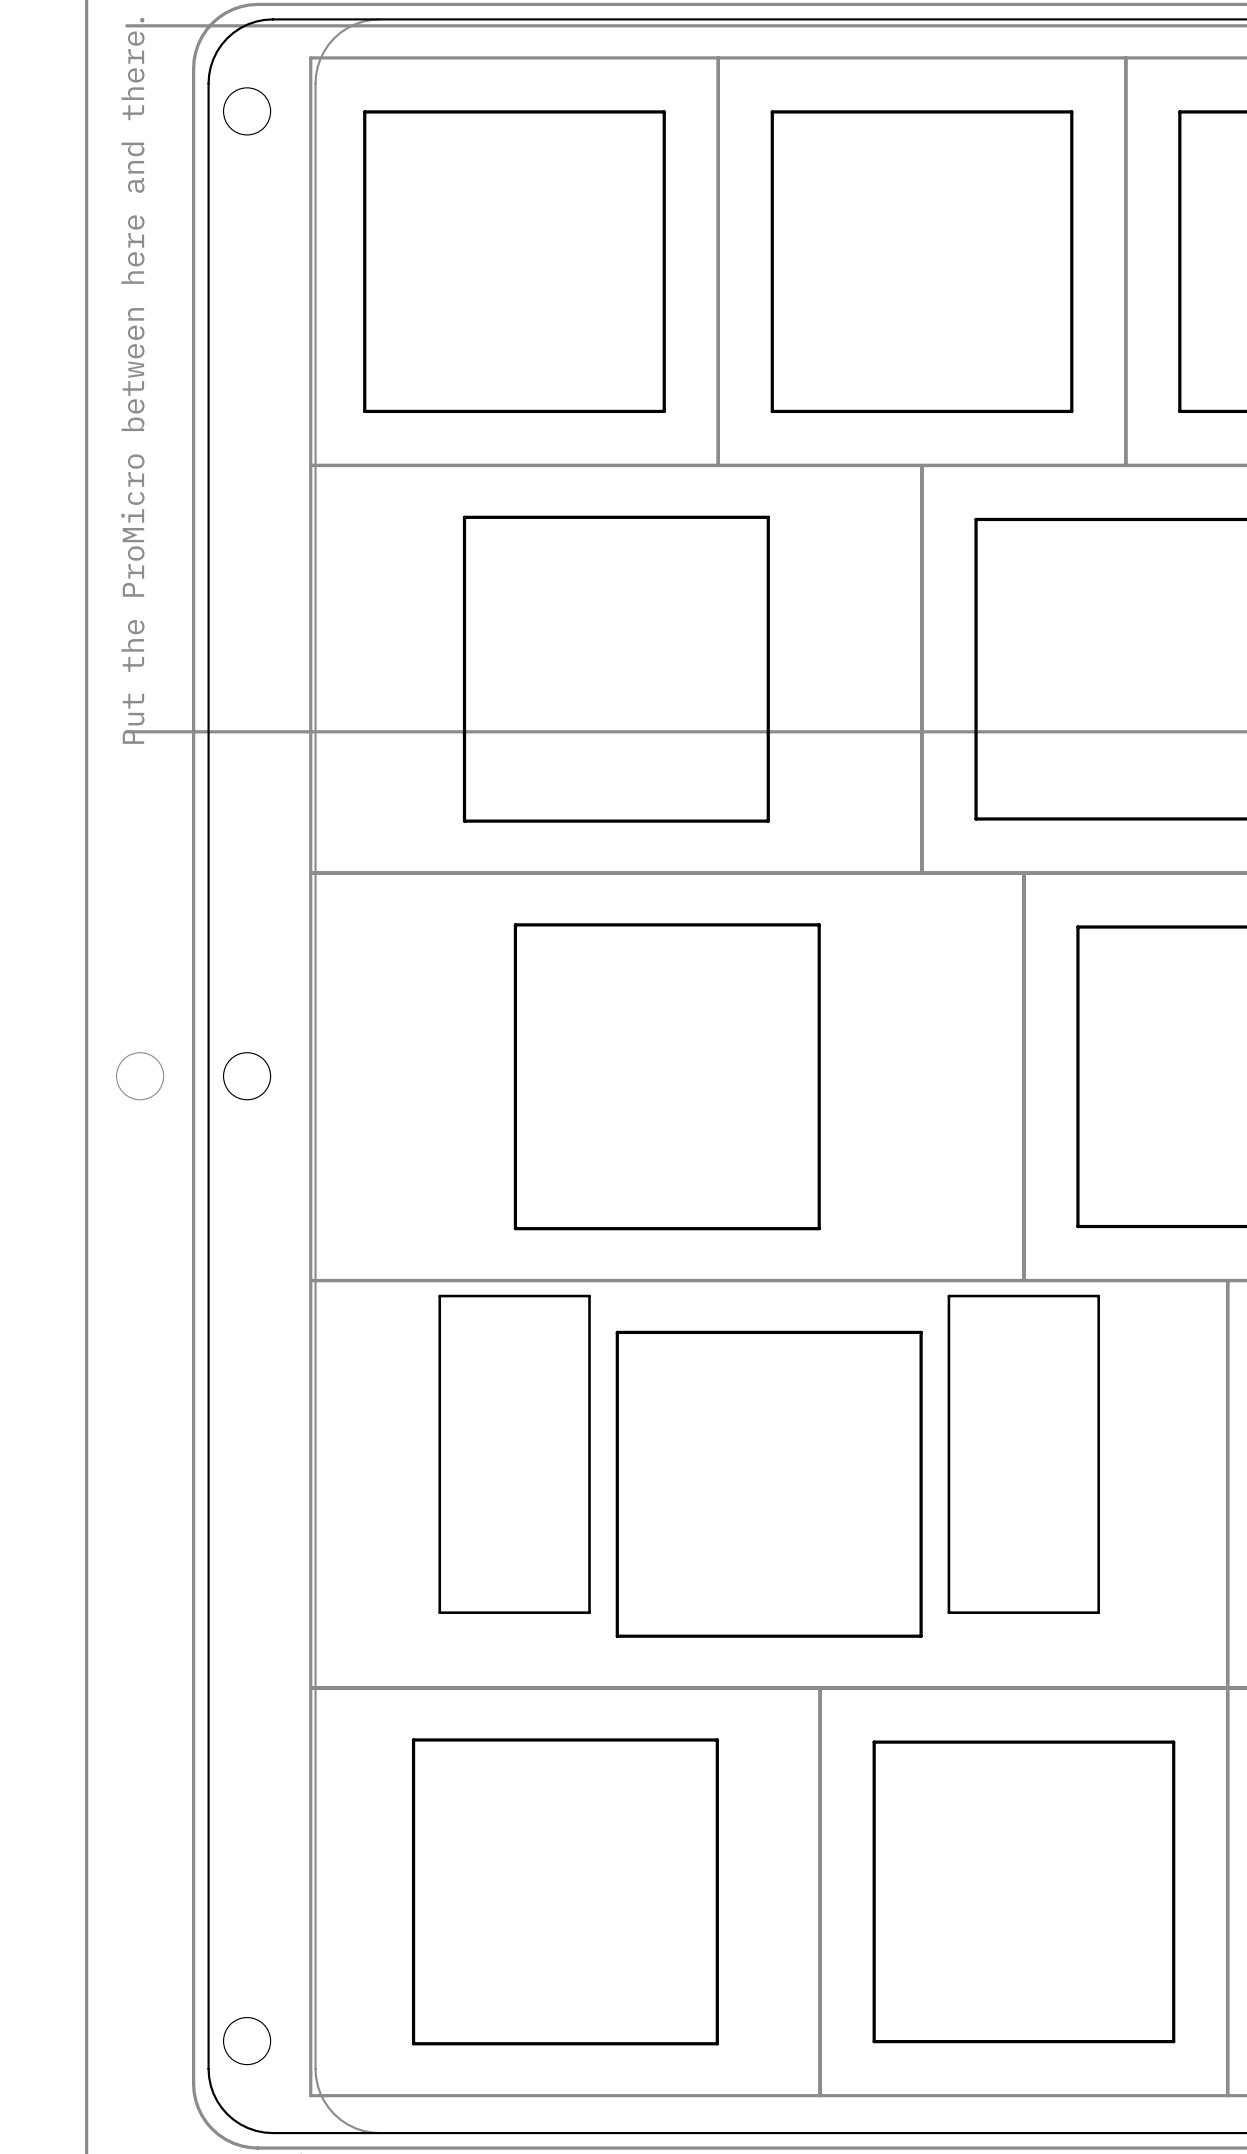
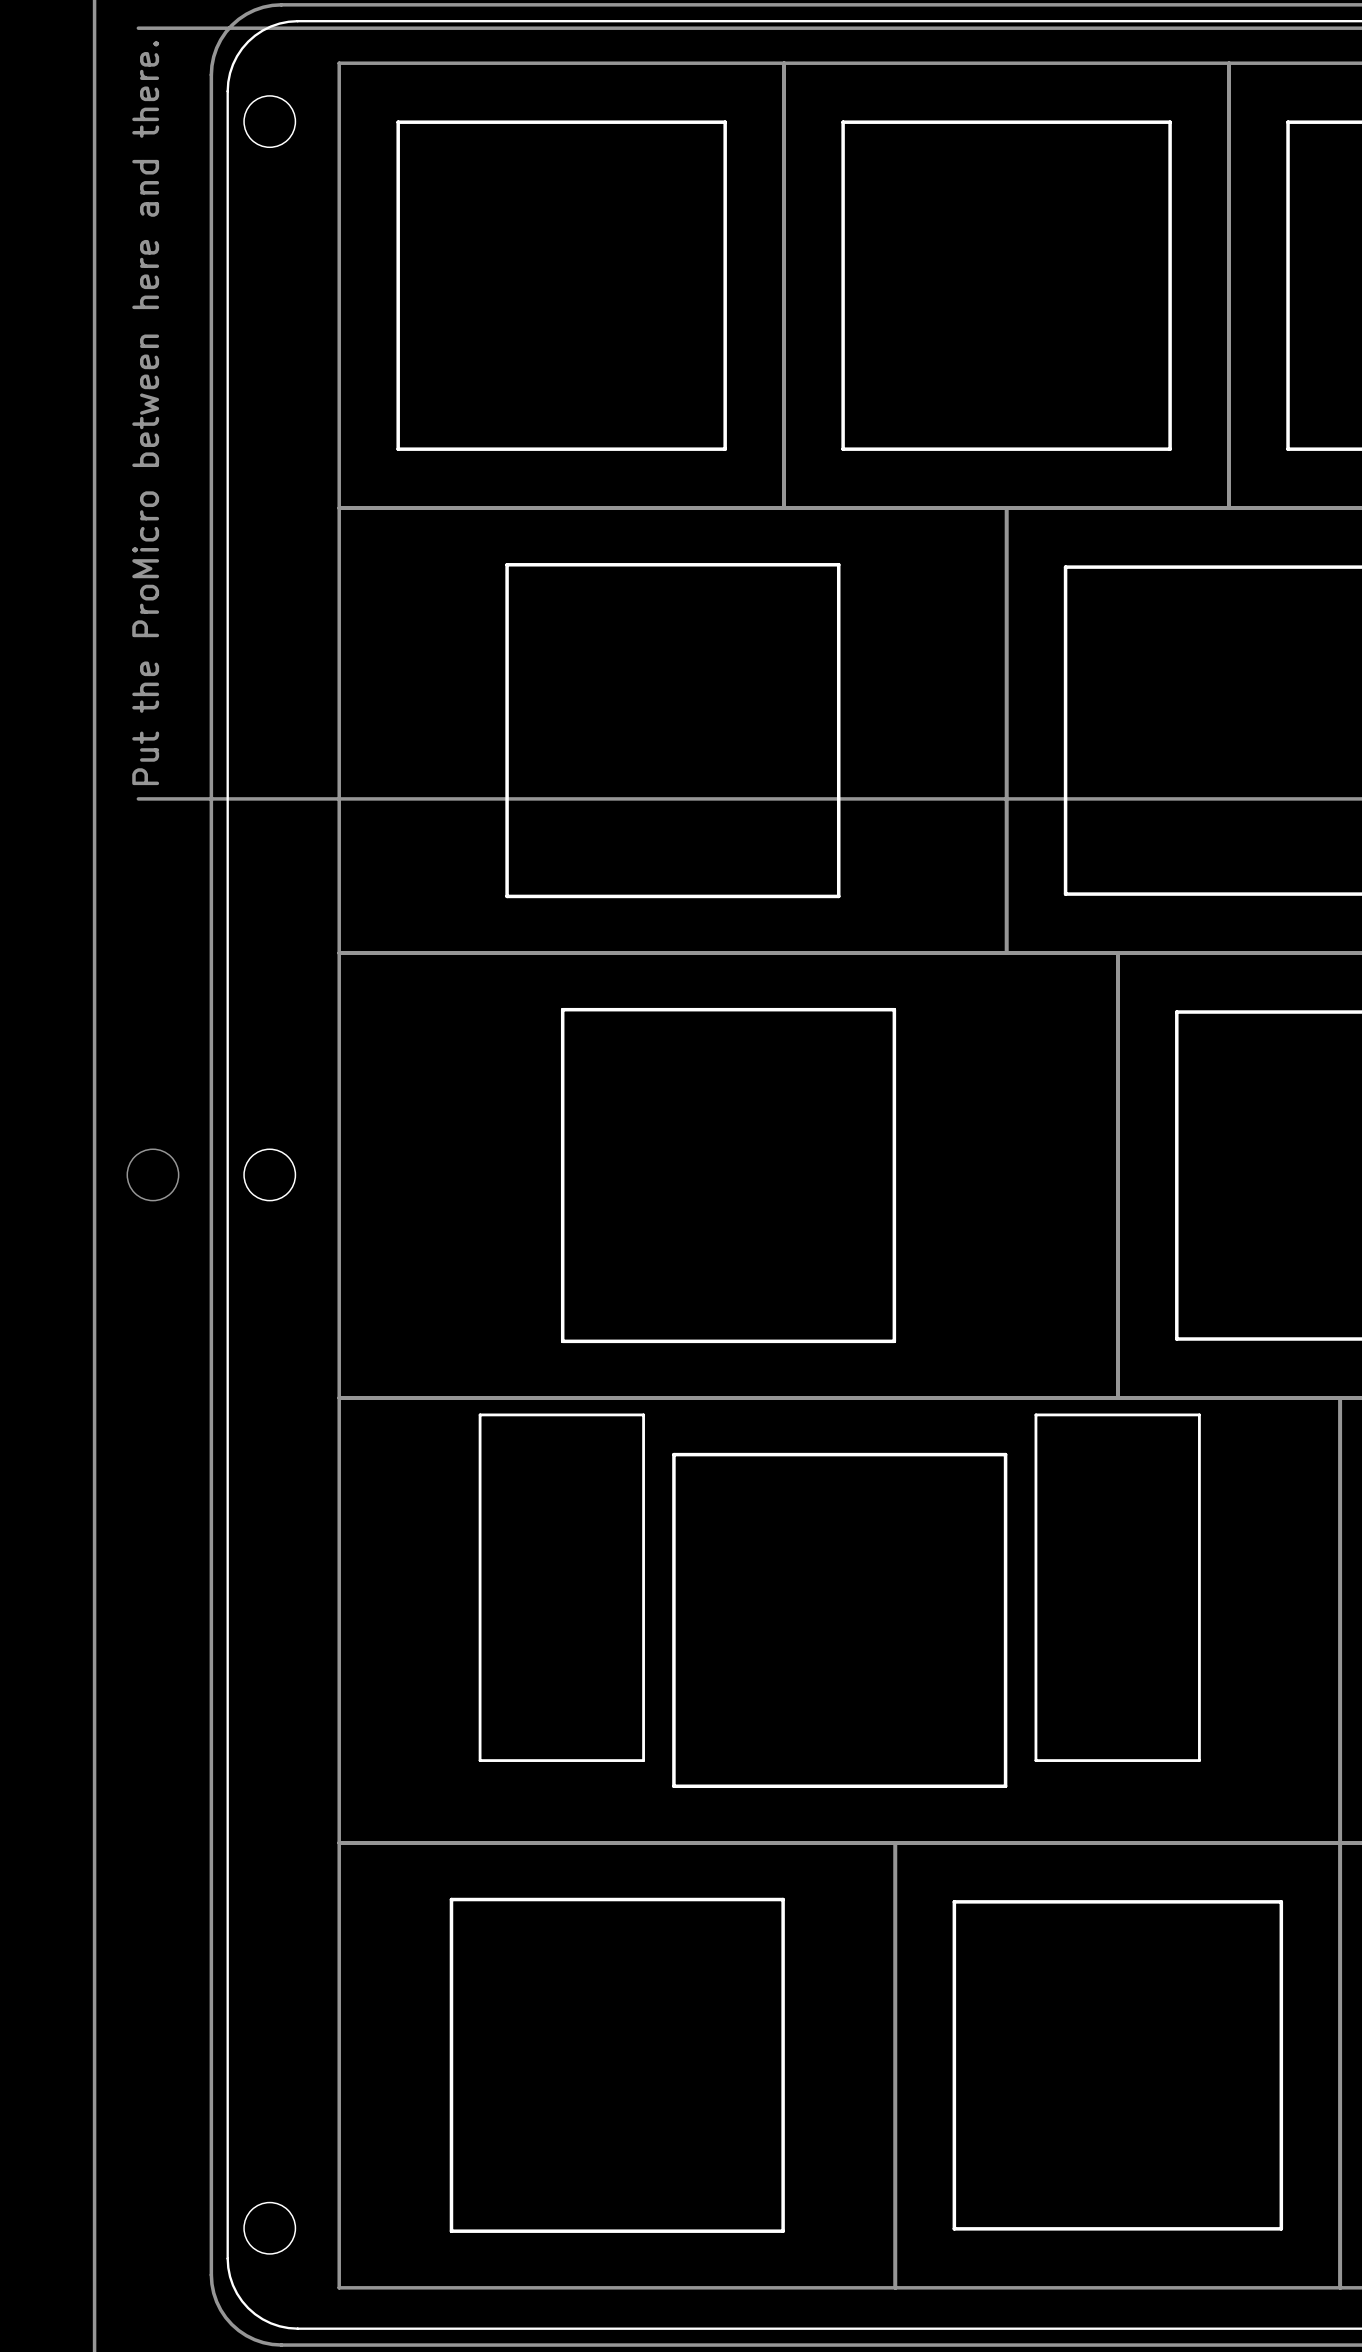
line: (379, 19) (355, 24) (334, 38) (320, 59) (315, 83) (315, 2068) (320, 2093) (334, 2114) (355, 2128) (379, 2133) -> none

